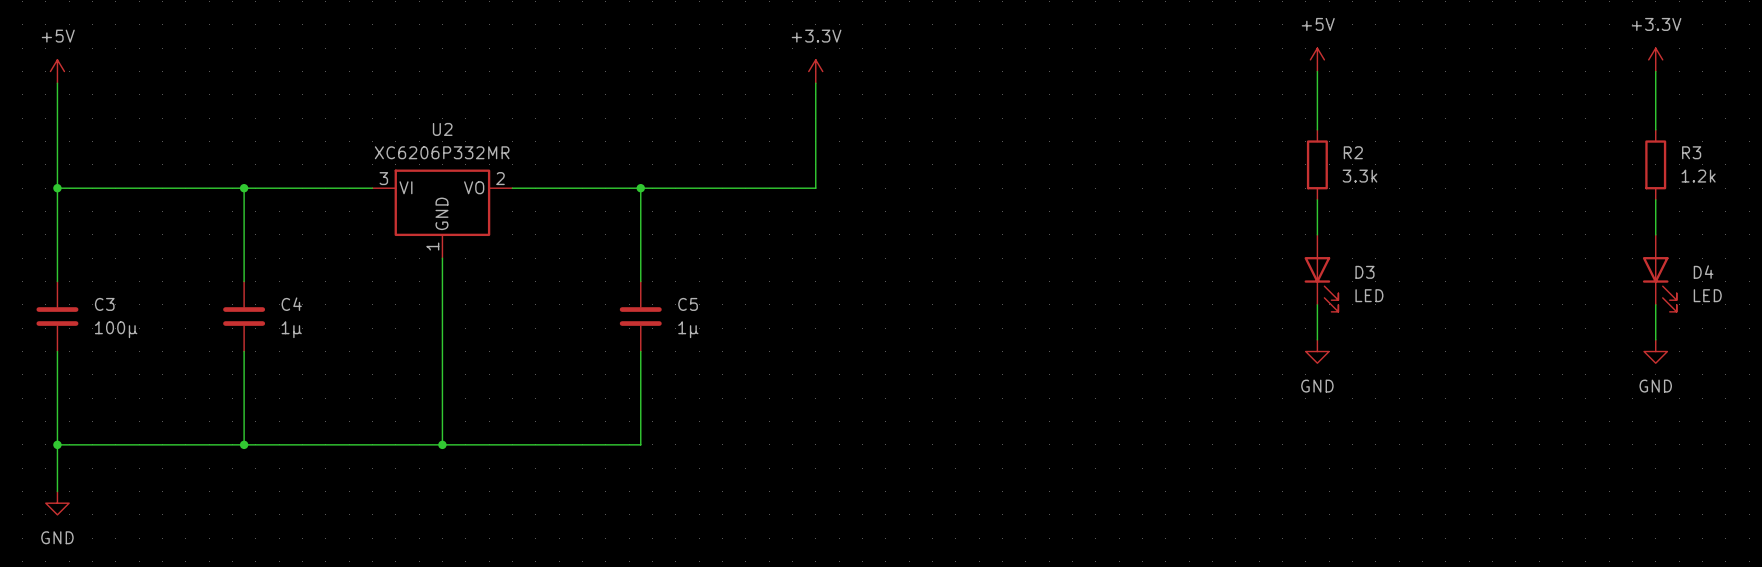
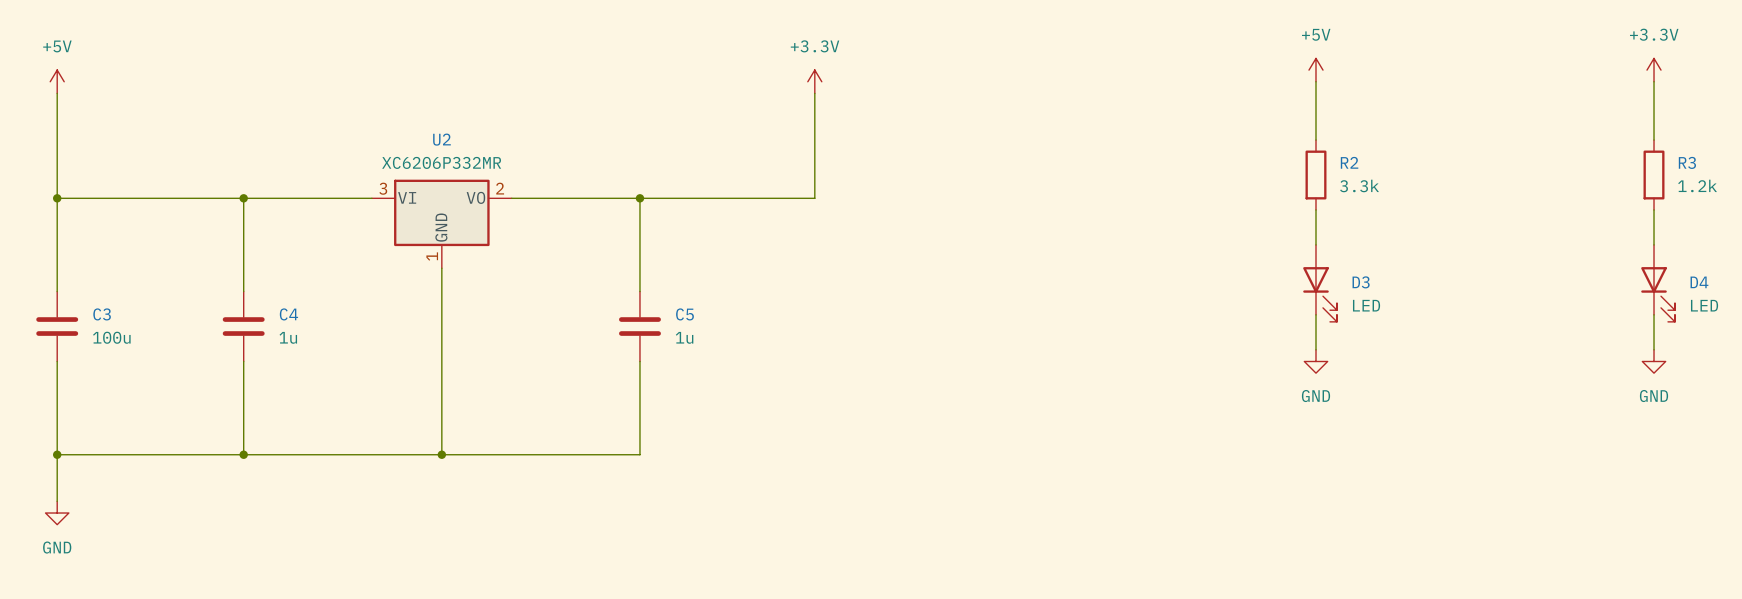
C3 value: 100μ (116, 329) -> 100u (111, 337)
C4 value: 1μ (291, 329) -> 1u (288, 337)
C5 value: 1μ (688, 329) -> 1u (684, 337)

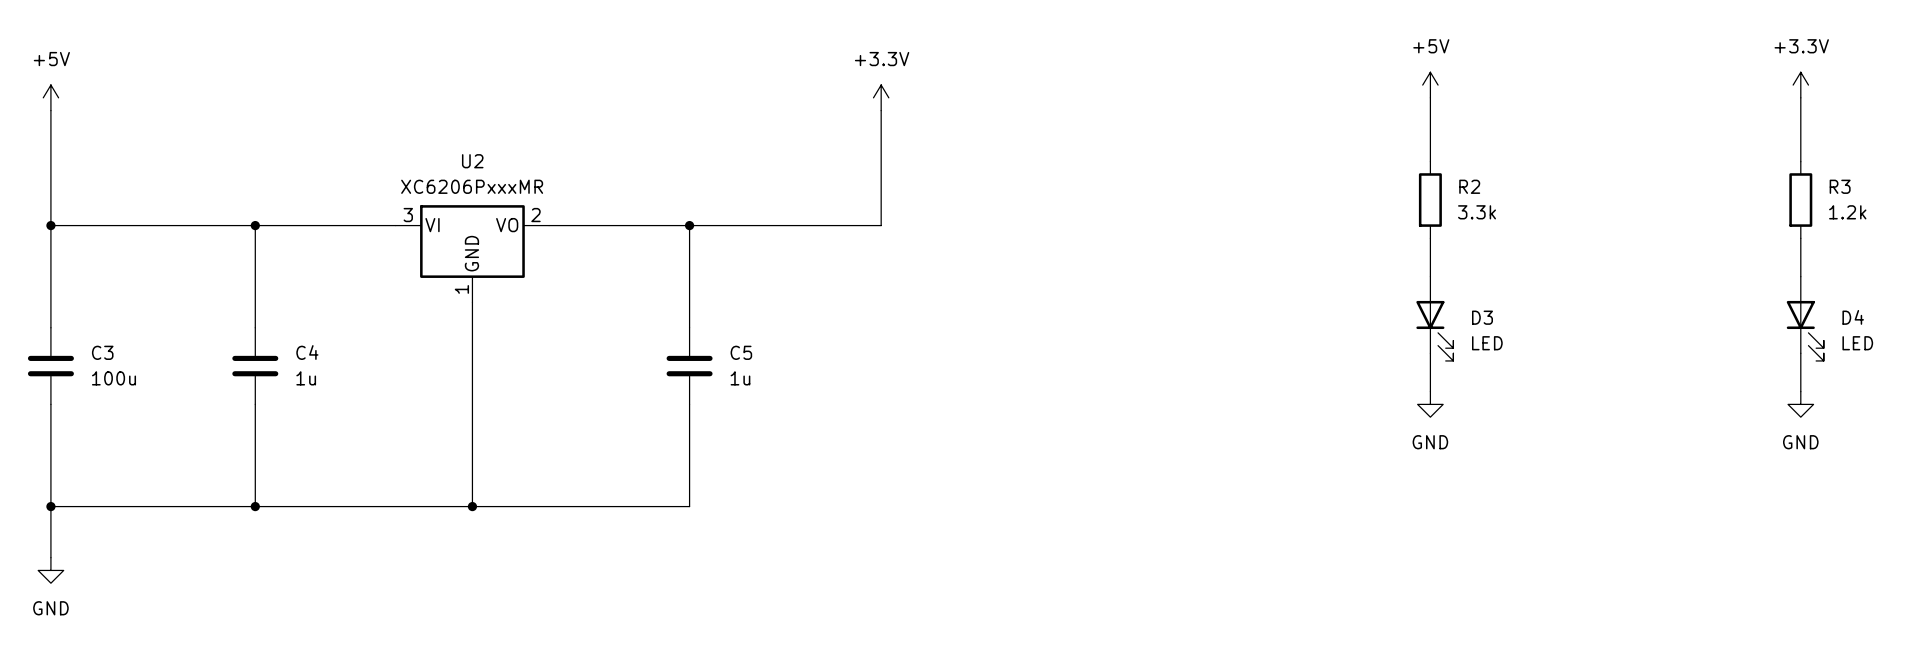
U2 value: XC6206P332MR (441, 162) -> XC6206PxxxMR (472, 186)

